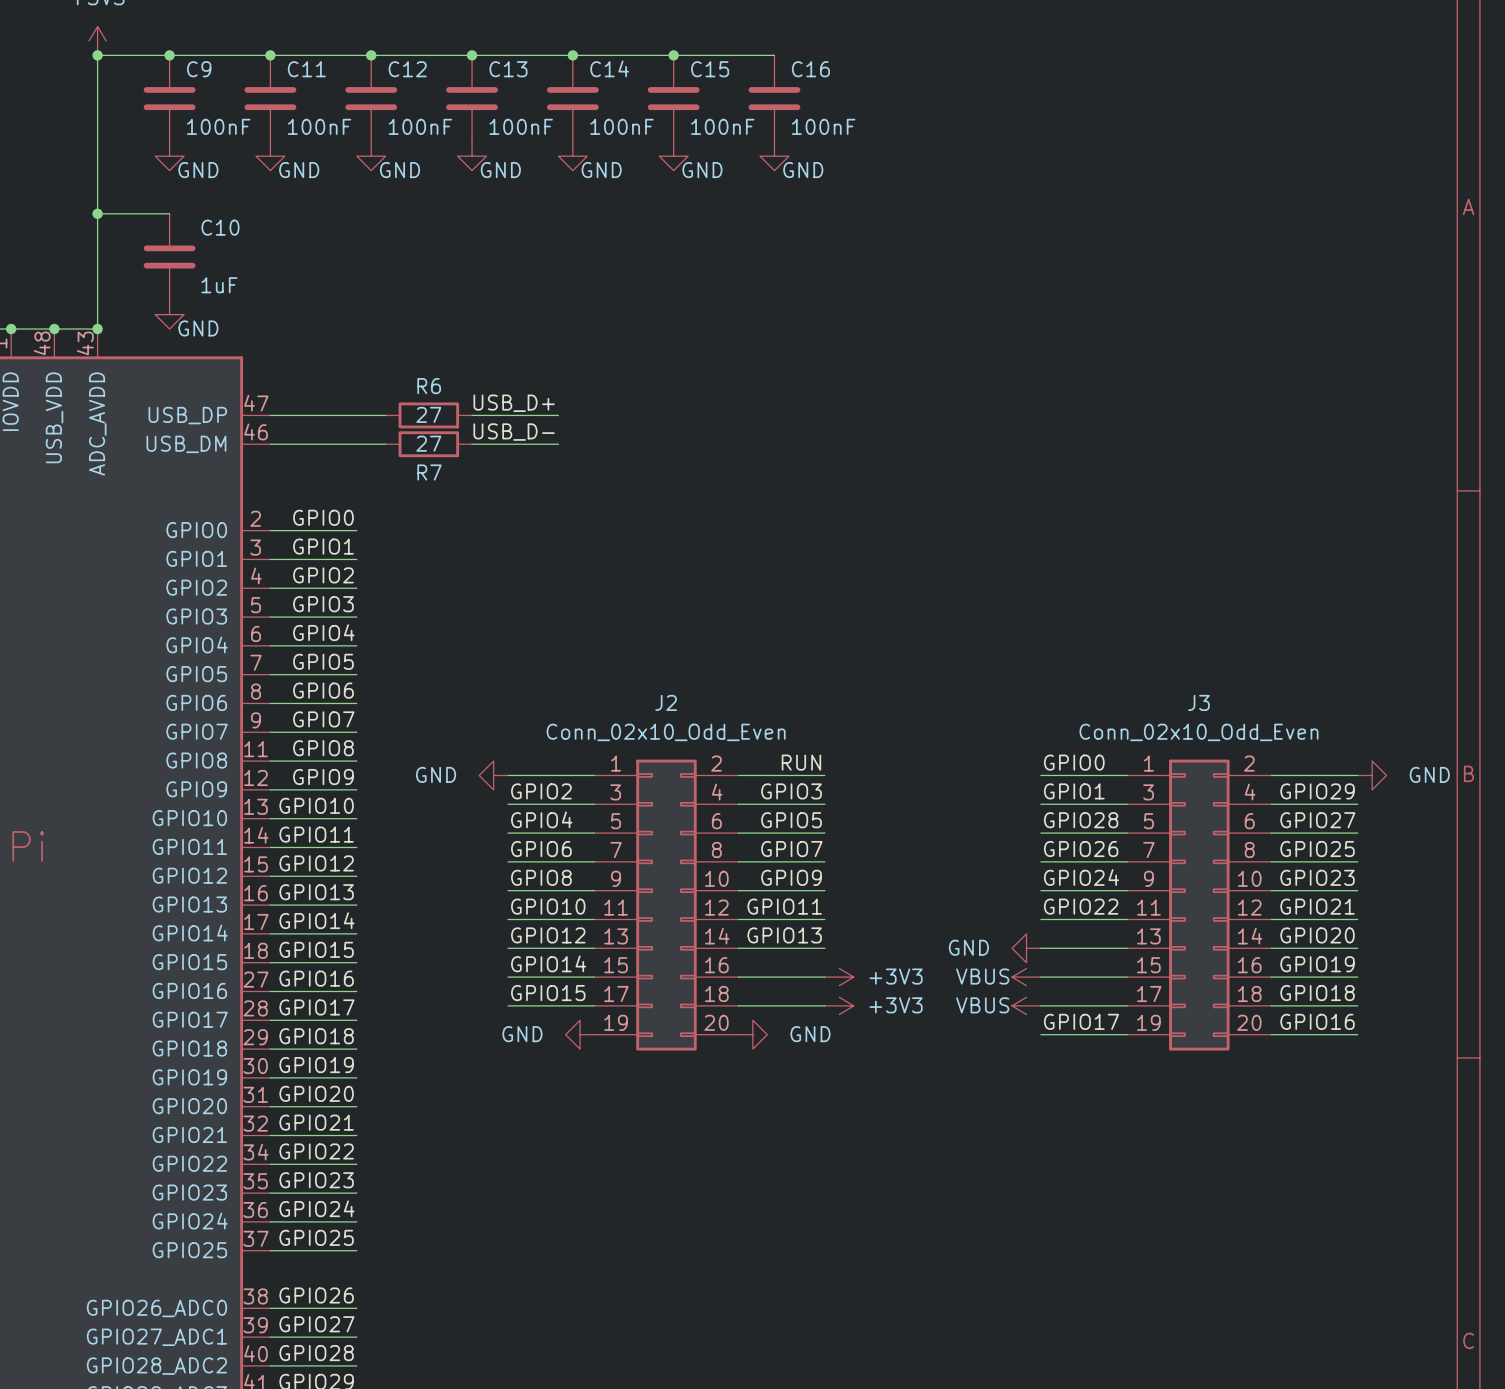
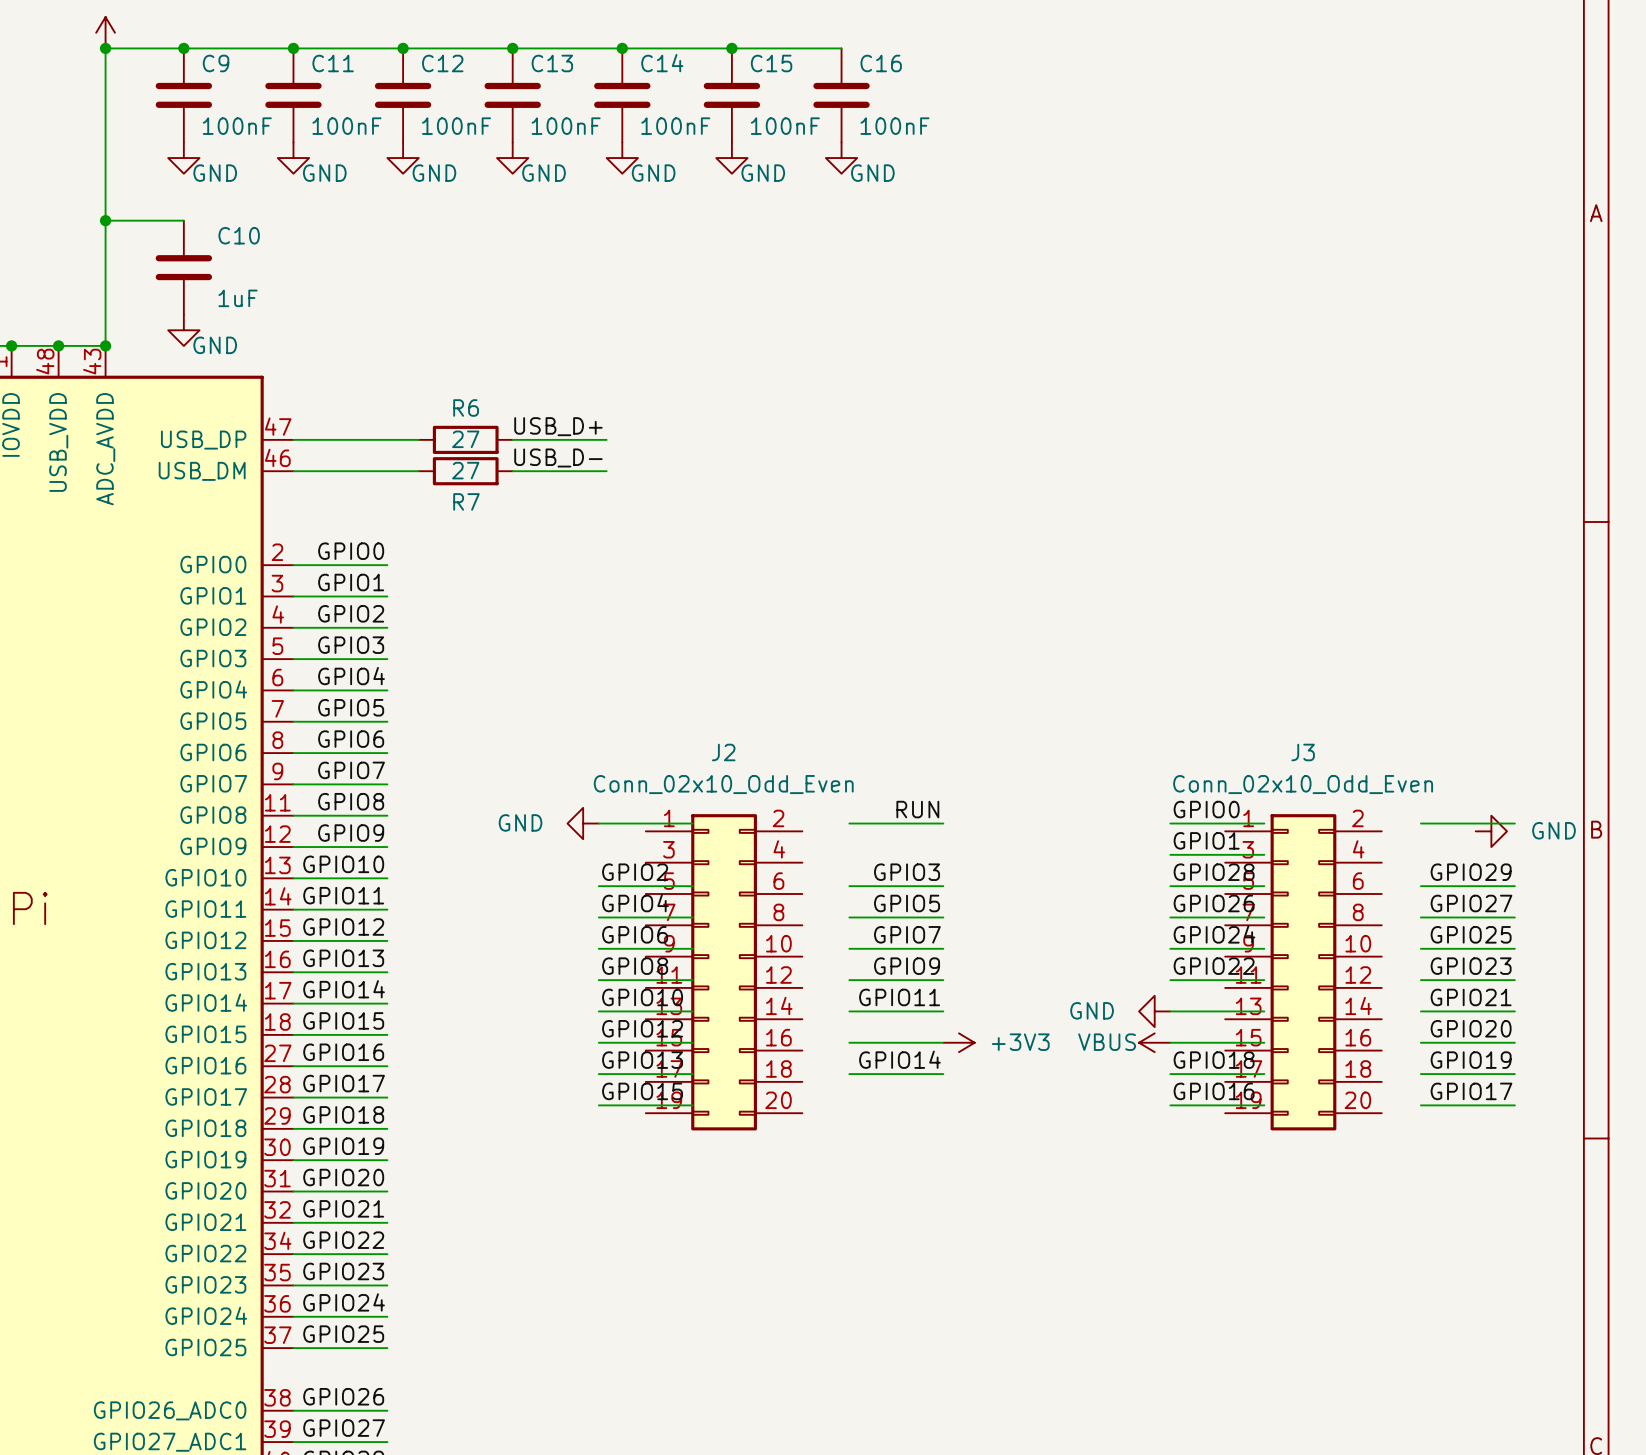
label position: RUN (801, 762) -> RUN (917, 809)
label position: GPIO0 (1074, 762) -> GPIO0 (1206, 809)
power symbol position: GND (493, 775) -> GND (583, 823)
wire: (508, 775) (594, 775) -> (598, 823) (692, 823)
wire: (738, 775) (824, 775) -> (849, 823) (943, 823)
wire: (1040, 775) (1127, 775) -> (1170, 823) (1264, 823)
wire: (1271, 775) (1357, 775) -> (1420, 823) (1514, 823)
label position: GPIO2 (541, 791) -> GPIO2 (635, 872)
label position: GPIO3 (791, 791) -> GPIO3 (907, 872)
label position: GPIO1 (1074, 791) -> GPIO1 (1206, 840)
label position: GPIO29 (1317, 791) -> GPIO29 (1471, 872)
wire: (508, 804) (594, 804) -> (598, 1105) (692, 1105)
wire: (738, 804) (824, 804) -> none
wire: (1040, 804) (1127, 804) -> (1170, 854) (1264, 854)
wire: (1271, 804) (1357, 804) -> none
label position: GPIO4 (541, 819) -> GPIO4 (635, 903)
label position: GPIO5 (791, 820) -> GPIO5 (907, 903)
label position: GPIO28 (1081, 820) -> GPIO28 (1214, 872)
label position: GPIO27 (1317, 820) -> GPIO27 (1471, 903)
wire: (508, 833) (594, 833) -> (598, 886) (692, 886)
wire: (738, 833) (824, 833) -> (849, 886) (943, 886)
wire: (1040, 833) (1127, 833) -> (1170, 886) (1264, 886)
wire: (1271, 833) (1357, 833) -> (1420, 886) (1514, 886)
label position: GPIO6 (541, 849) -> GPIO6 (635, 934)
label position: GPIO7 (791, 849) -> GPIO7 (907, 934)
label position: GPIO26 (1081, 849) -> GPIO26 (1214, 903)
label position: GPIO25 (1317, 849) -> GPIO25 (1471, 934)
wire: (508, 861) (594, 861) -> (598, 917) (692, 917)
wire: (738, 861) (824, 861) -> (849, 917) (943, 917)
wire: (1040, 861) (1127, 861) -> (1170, 917) (1264, 917)
wire: (1271, 861) (1357, 861) -> (1420, 917) (1514, 917)
label position: GPIO8 (541, 877) -> GPIO8 (635, 966)
label position: GPIO9 (791, 877) -> GPIO9 (907, 966)
label position: GPIO24 (1081, 877) -> GPIO24 (1214, 934)
label position: GPIO23 (1317, 877) -> GPIO23 (1471, 966)
wire: (508, 890) (594, 890) -> (598, 948) (692, 948)
wire: (738, 890) (824, 890) -> (849, 948) (943, 948)
wire: (1040, 890) (1127, 890) -> (1170, 948) (1264, 948)
wire: (1271, 890) (1357, 890) -> (1420, 948) (1514, 948)
label position: GPIO10 (548, 906) -> GPIO10 (642, 997)
label position: GPIO11 (784, 906) -> GPIO11 (899, 997)
label position: GPIO22 (1081, 906) -> GPIO22 (1214, 966)
label position: GPIO21 (1317, 906) -> GPIO21 (1471, 997)
wire: (508, 919) (594, 919) -> (598, 980) (692, 980)
wire: (738, 919) (824, 919) -> (849, 980) (943, 980)
wire: (1040, 919) (1127, 919) -> (1170, 980) (1264, 980)
wire: (1271, 919) (1357, 919) -> (1420, 980) (1514, 980)
label position: GPIO12 (548, 935) -> GPIO12 (642, 1028)
label position: GPIO13 (784, 935) -> GPIO13 (642, 1060)
label position: GPIO20 (1317, 935) -> GPIO20 (1471, 1028)
wire: (508, 948) (594, 948) -> (598, 1011) (692, 1011)
wire: (738, 948) (824, 948) -> (849, 1011) (943, 1011)
power symbol position: GND (1026, 948) -> GND (1154, 1011)
wire: (1040, 948) (1127, 948) -> (1170, 1011) (1264, 1011)
wire: (1271, 948) (1357, 948) -> (1420, 1011) (1514, 1011)
label: GPIO14 (548, 963) -> none
label position: GPIO19 (1317, 964) -> GPIO19 (1471, 1060)
power symbol: none -> +3V3 (958, 1042)
power symbol: none -> VBUS (1154, 1042)
wire: (508, 977) (594, 977) -> (598, 1042) (692, 1042)
wire: (738, 977) (824, 977) -> (849, 1042) (943, 1042)
power symbol: +3V3 (839, 977) -> none
power symbol: VBUS (1026, 977) -> none
wire: (1040, 977) (1127, 977) -> (1170, 1042) (1264, 1042)
wire: (1271, 977) (1357, 977) -> (1420, 1042) (1514, 1042)
label: none -> GPIO14 (899, 1059)
label position: GPIO15 (548, 993) -> GPIO15 (642, 1091)
label position: GPIO18 (1317, 993) -> GPIO18 (1214, 1060)
wire: (508, 1005) (594, 1005) -> (598, 1074) (692, 1074)
wire: (738, 1005) (824, 1005) -> (849, 1074) (943, 1074)
power symbol: +3V3 (839, 1005) -> none
power symbol: VBUS (1026, 1005) -> none
wire: (1040, 1005) (1127, 1005) -> (1170, 1074) (1264, 1074)
wire: (1271, 1005) (1357, 1005) -> (1420, 1074) (1514, 1074)
label: none -> GPIO17 (1471, 1091)
label: GPIO17 (1081, 1021) -> none
label position: GPIO16 (1317, 1021) -> GPIO16 (1214, 1091)
power symbol: GND (580, 1034) -> none
power symbol: GND (752, 1034) -> none
wire: (1040, 1034) (1127, 1034) -> (1170, 1105) (1264, 1105)
wire: (1271, 1034) (1357, 1034) -> (1420, 1105) (1514, 1105)

